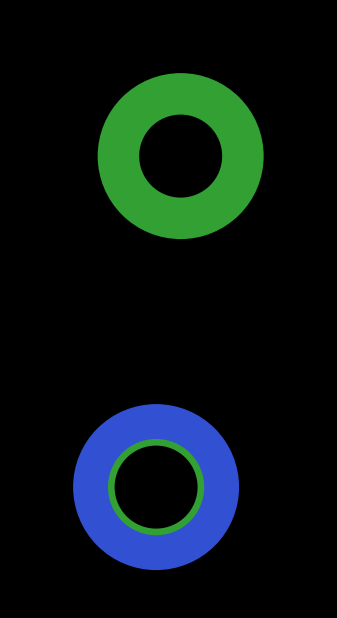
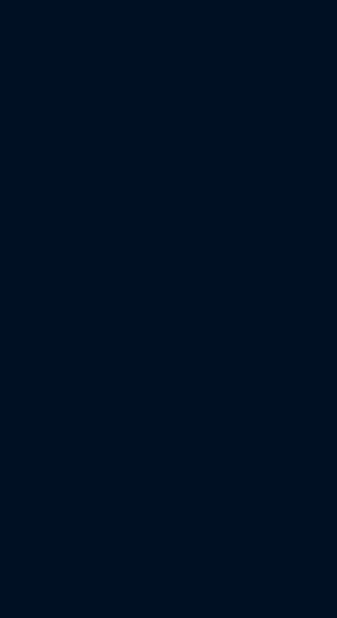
part: (180, 156) -> none
part: (156, 487) -> none

